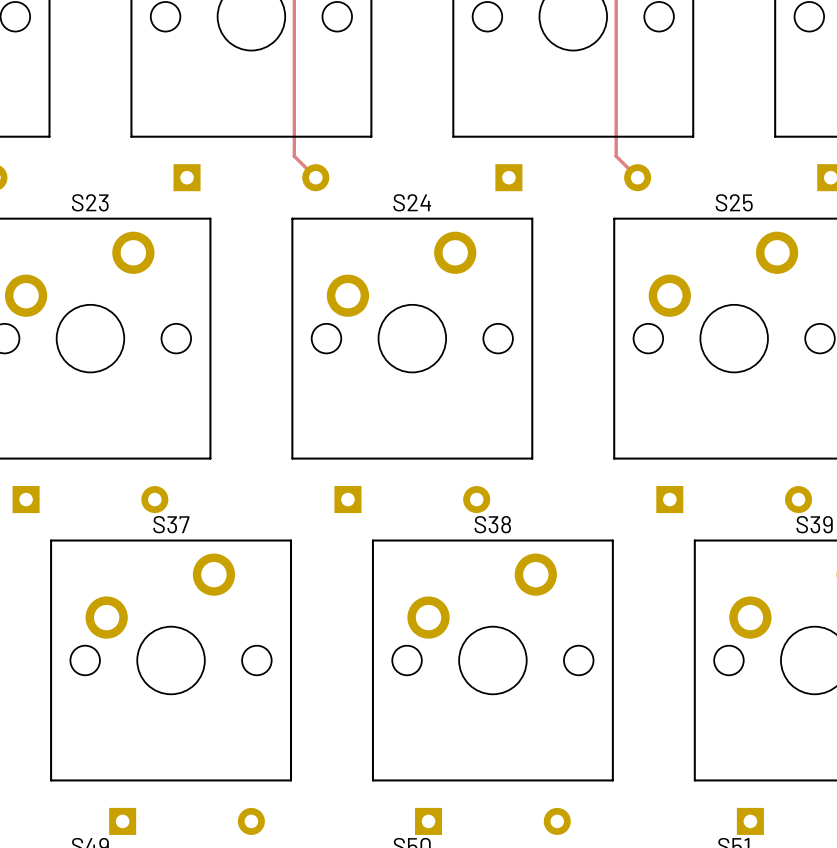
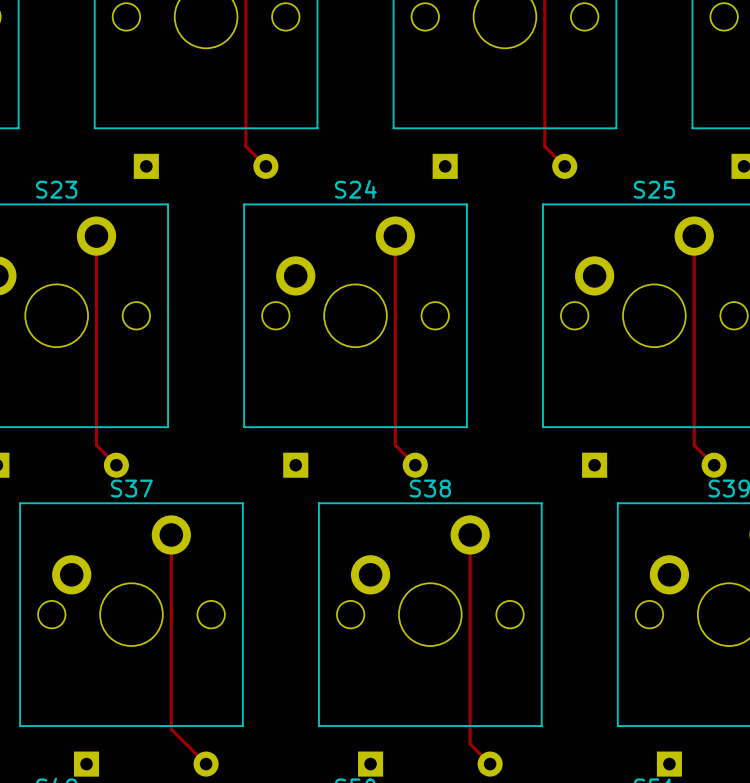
track: none -> (96, 236) (96, 445) (116, 465)
track: none -> (395, 236) (395, 445) (415, 465)
track: none -> (694, 236) (694, 445) (714, 465)
track: none -> (171, 534) (171, 729) (206, 764)
track: none -> (470, 534) (470, 744) (490, 764)

